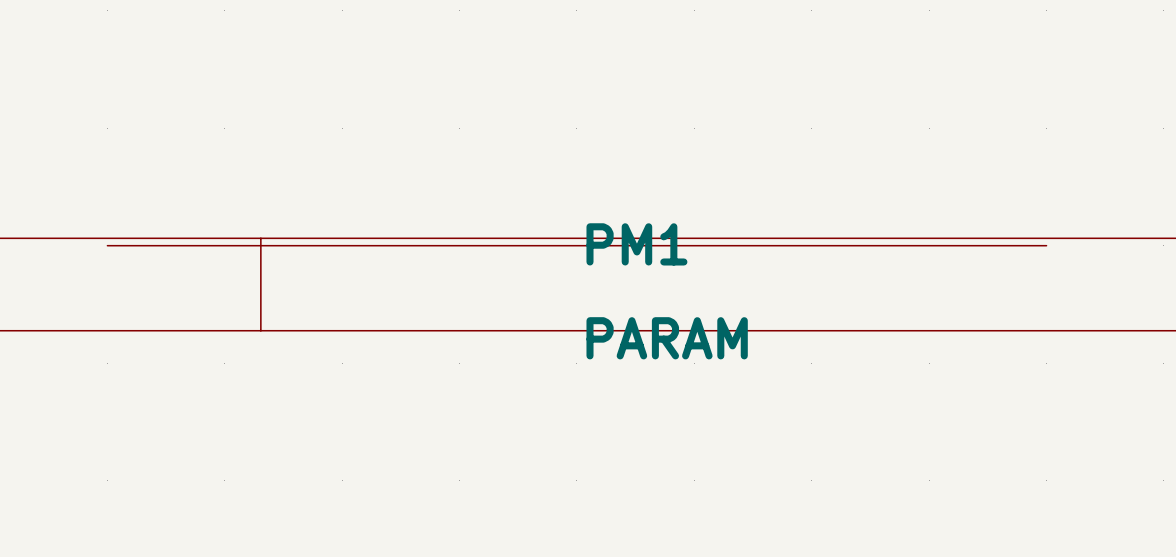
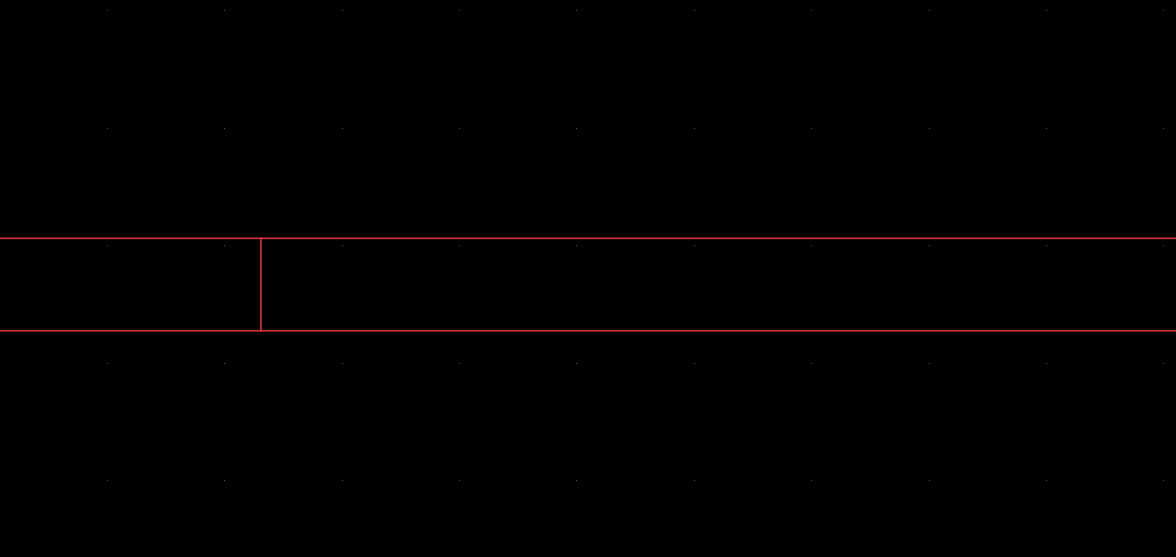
PM1: PARAM (576, 245) -> none

